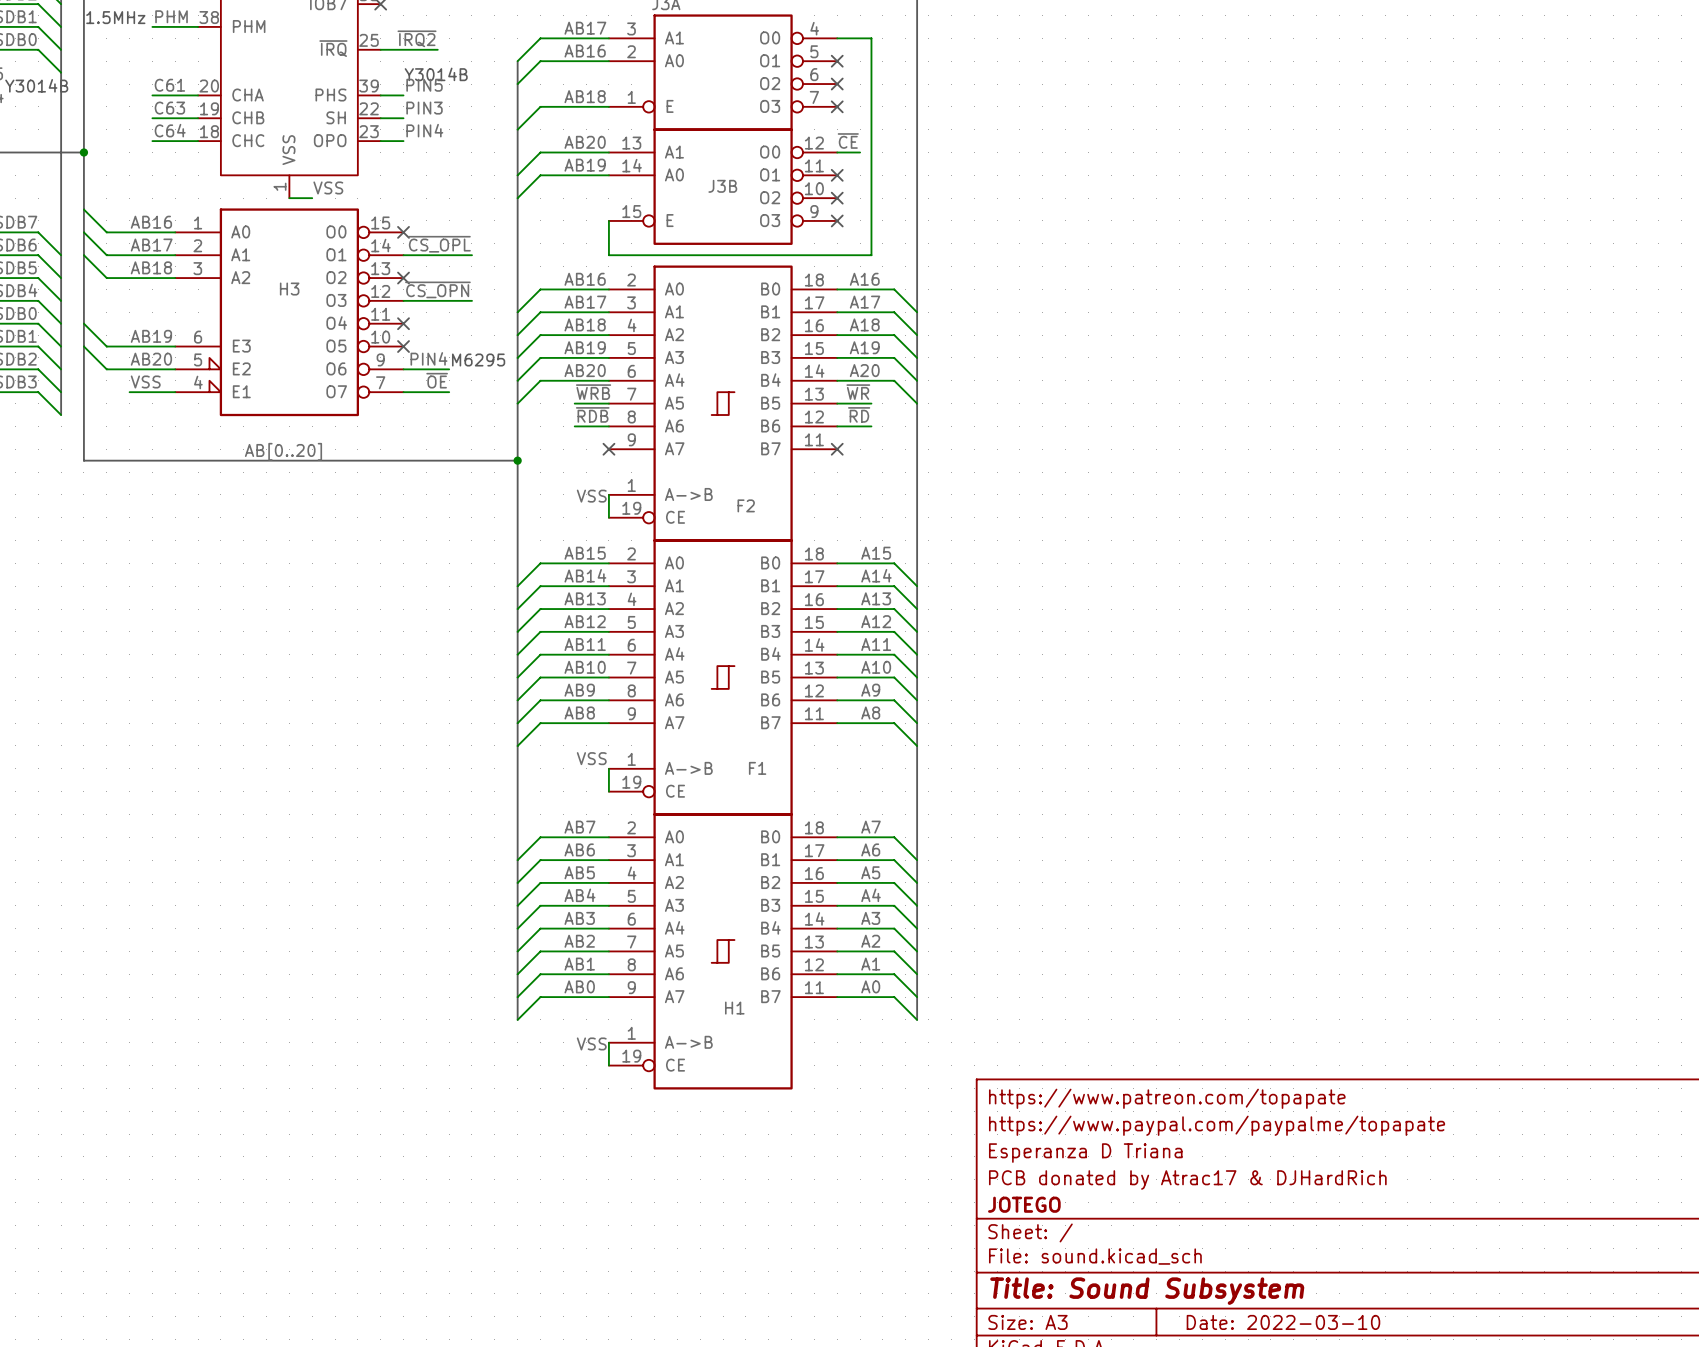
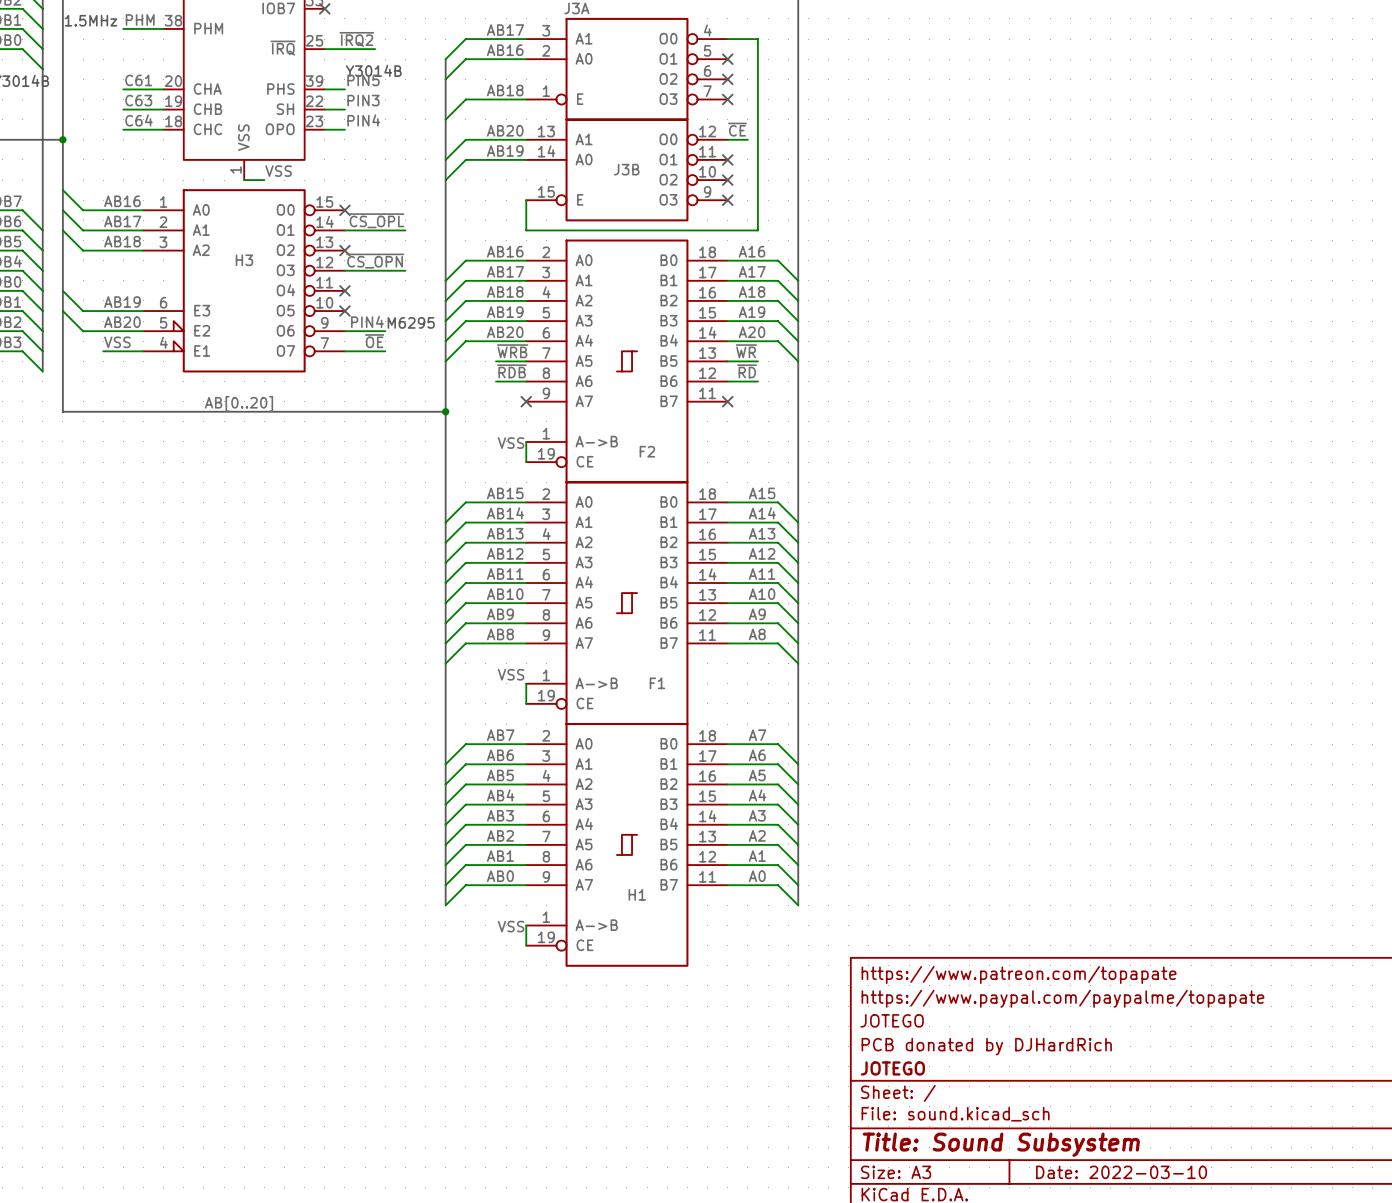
title block: Esperanza D Triana (1085, 1153) -> JOTEGO (892, 1020)
title block: PCB donated by Atrac17 & DJHardRich (1187, 1180) -> PCB donated by DJHardRich (986, 1046)

